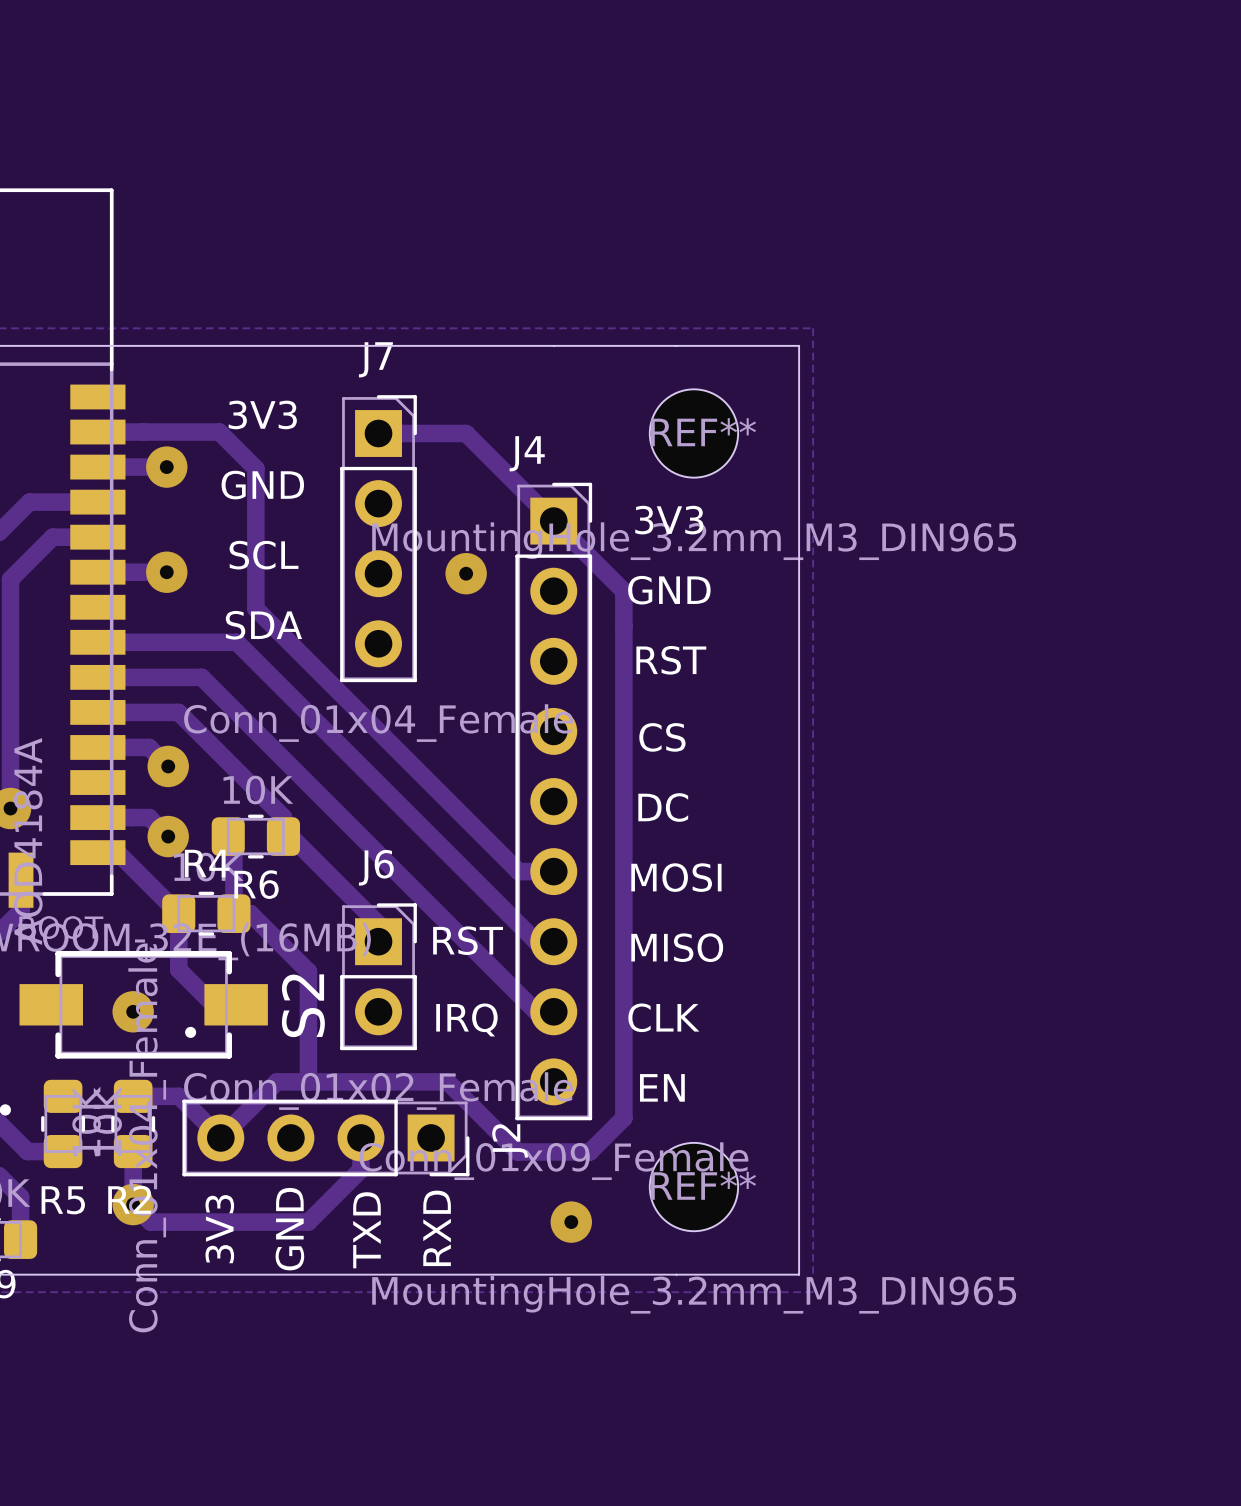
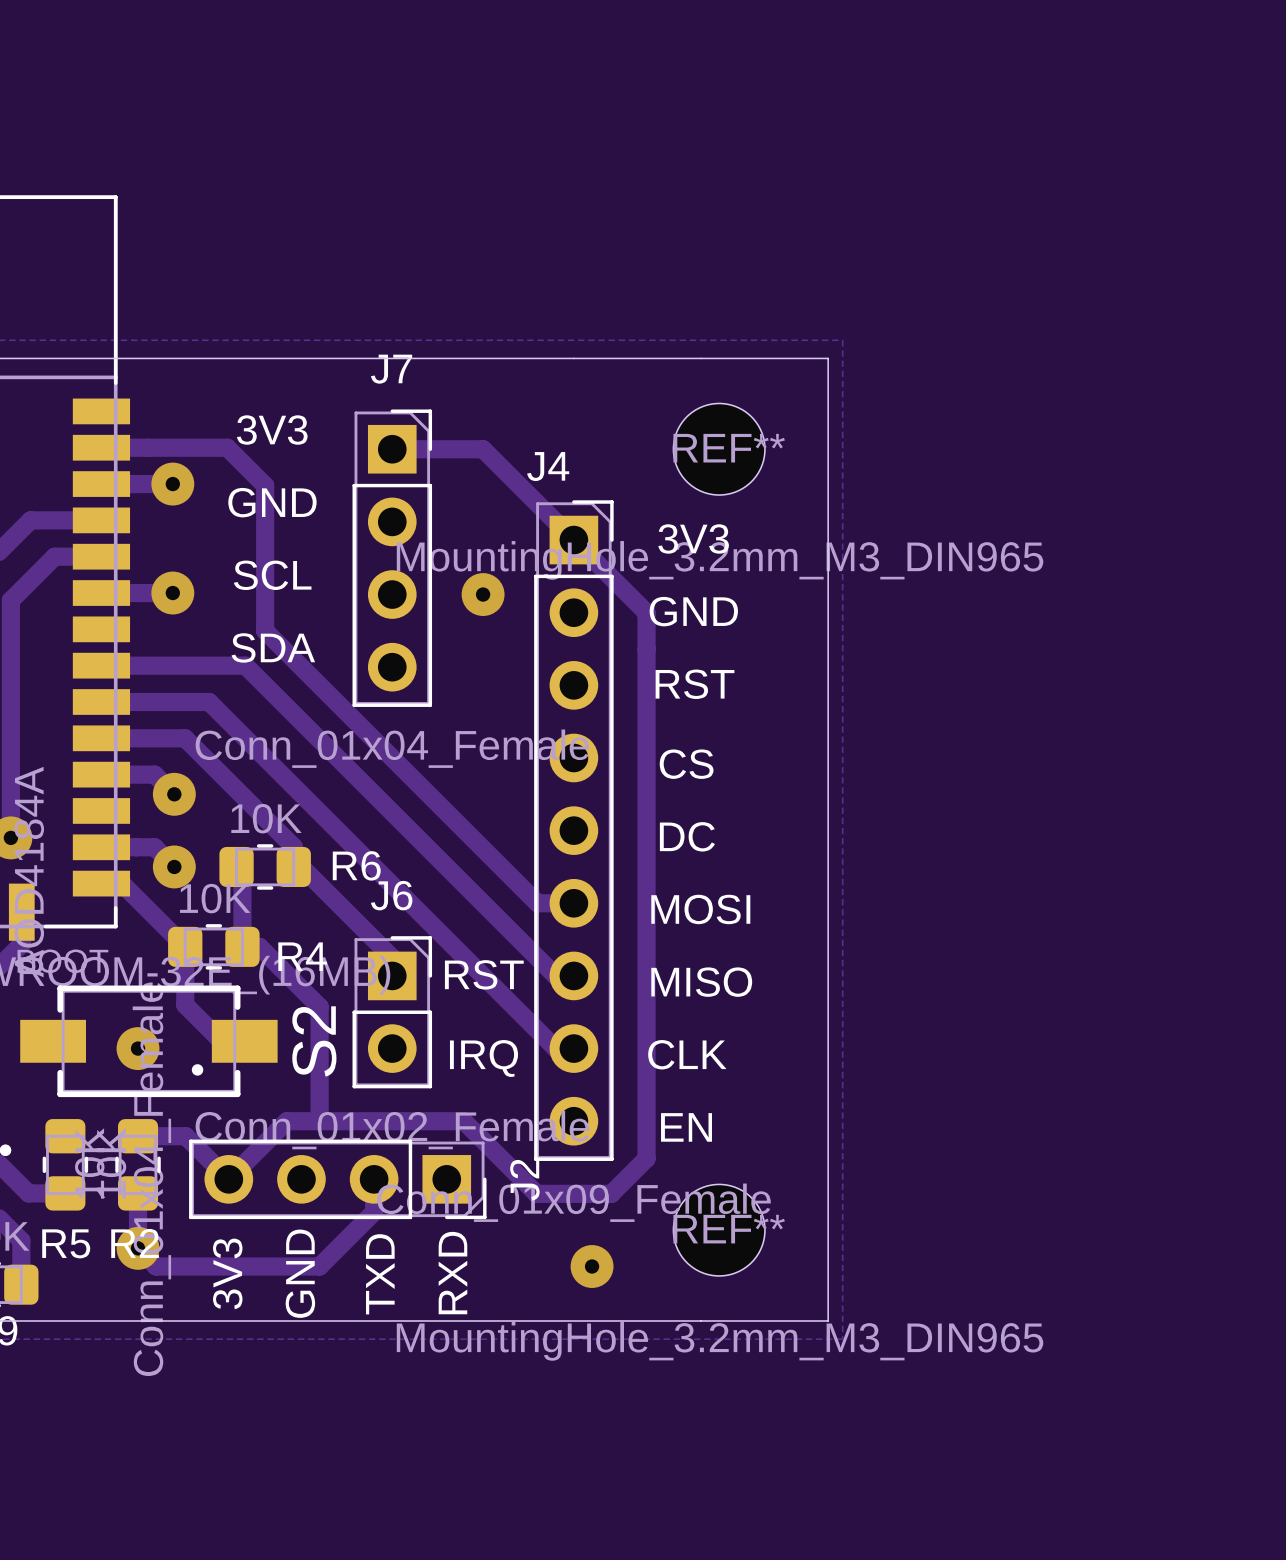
R4 name position: R4 (207, 863) -> R4 (302, 956)
R6 name position: R6 (256, 884) -> R6 (356, 865)

